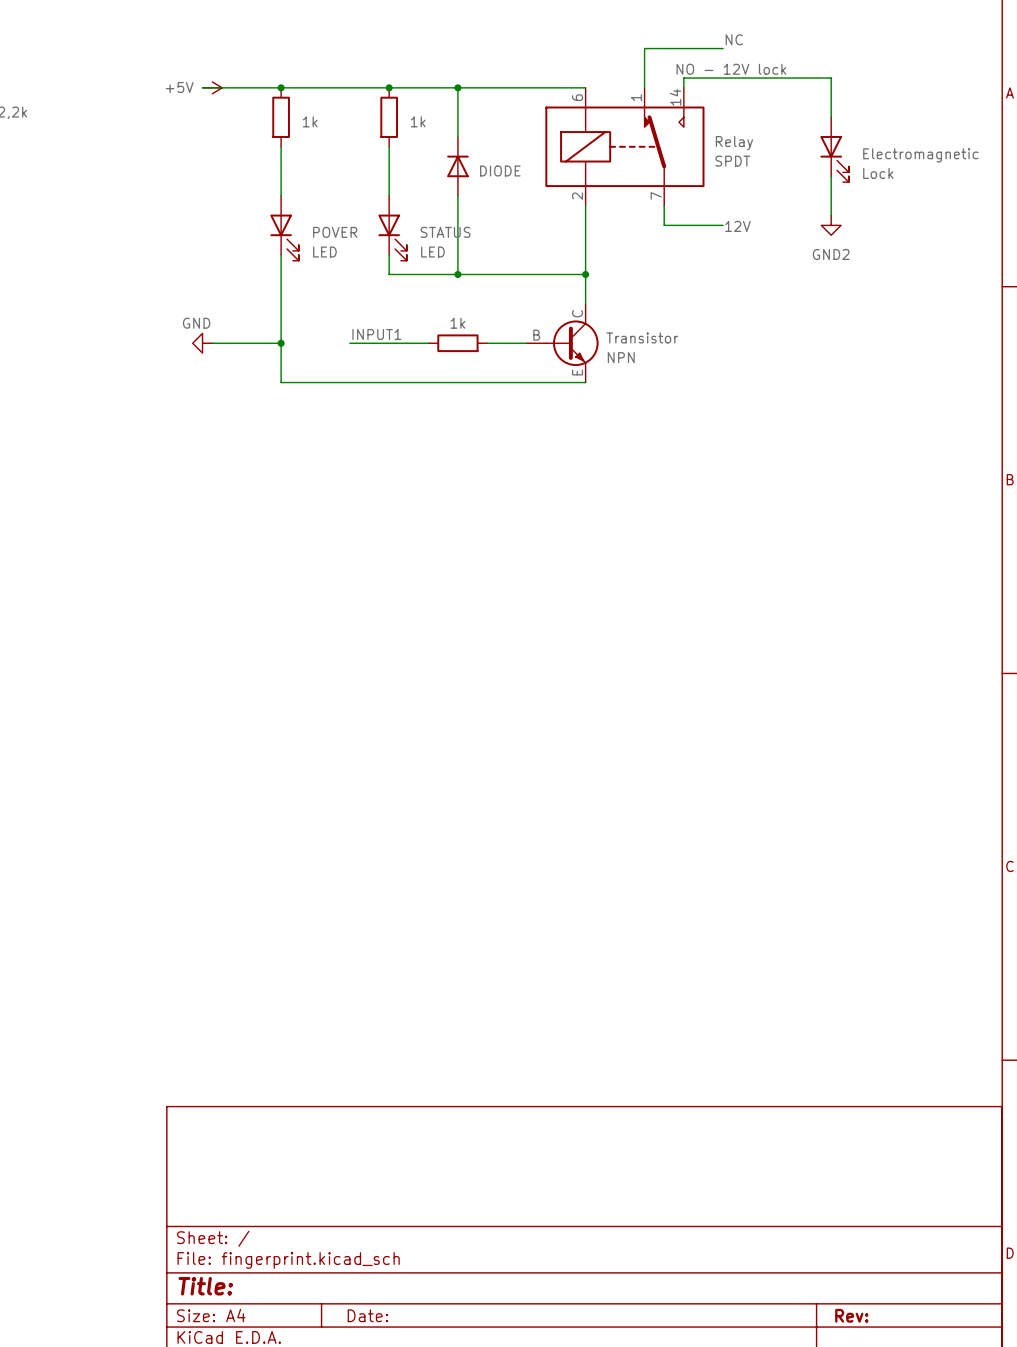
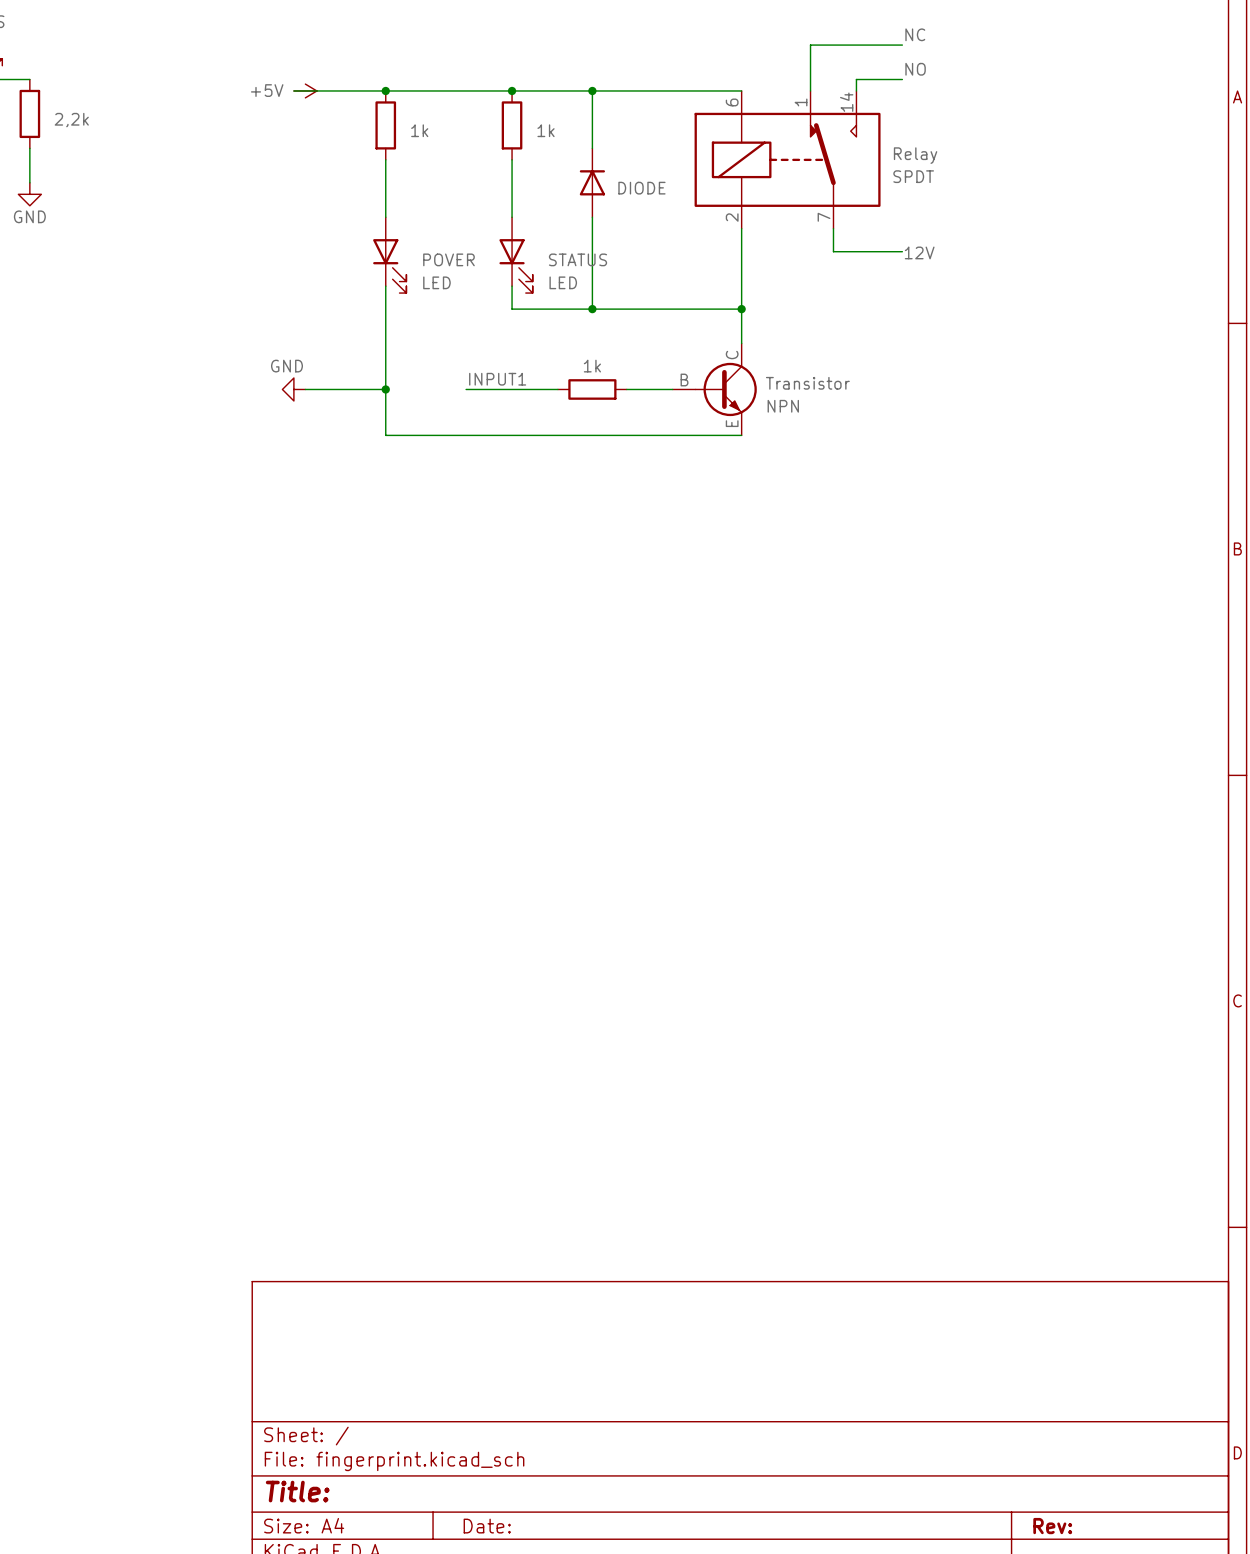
label: NO - 12V lock (731, 69) -> none
label: none -> NO (915, 69)
wire: (723, 78) (831, 78) (831, 117) -> none
Electromagnetic: Lock (834, 149) -> none
wire: (831, 176) (831, 215) -> none
power symbol: GND2 (831, 225) -> none

